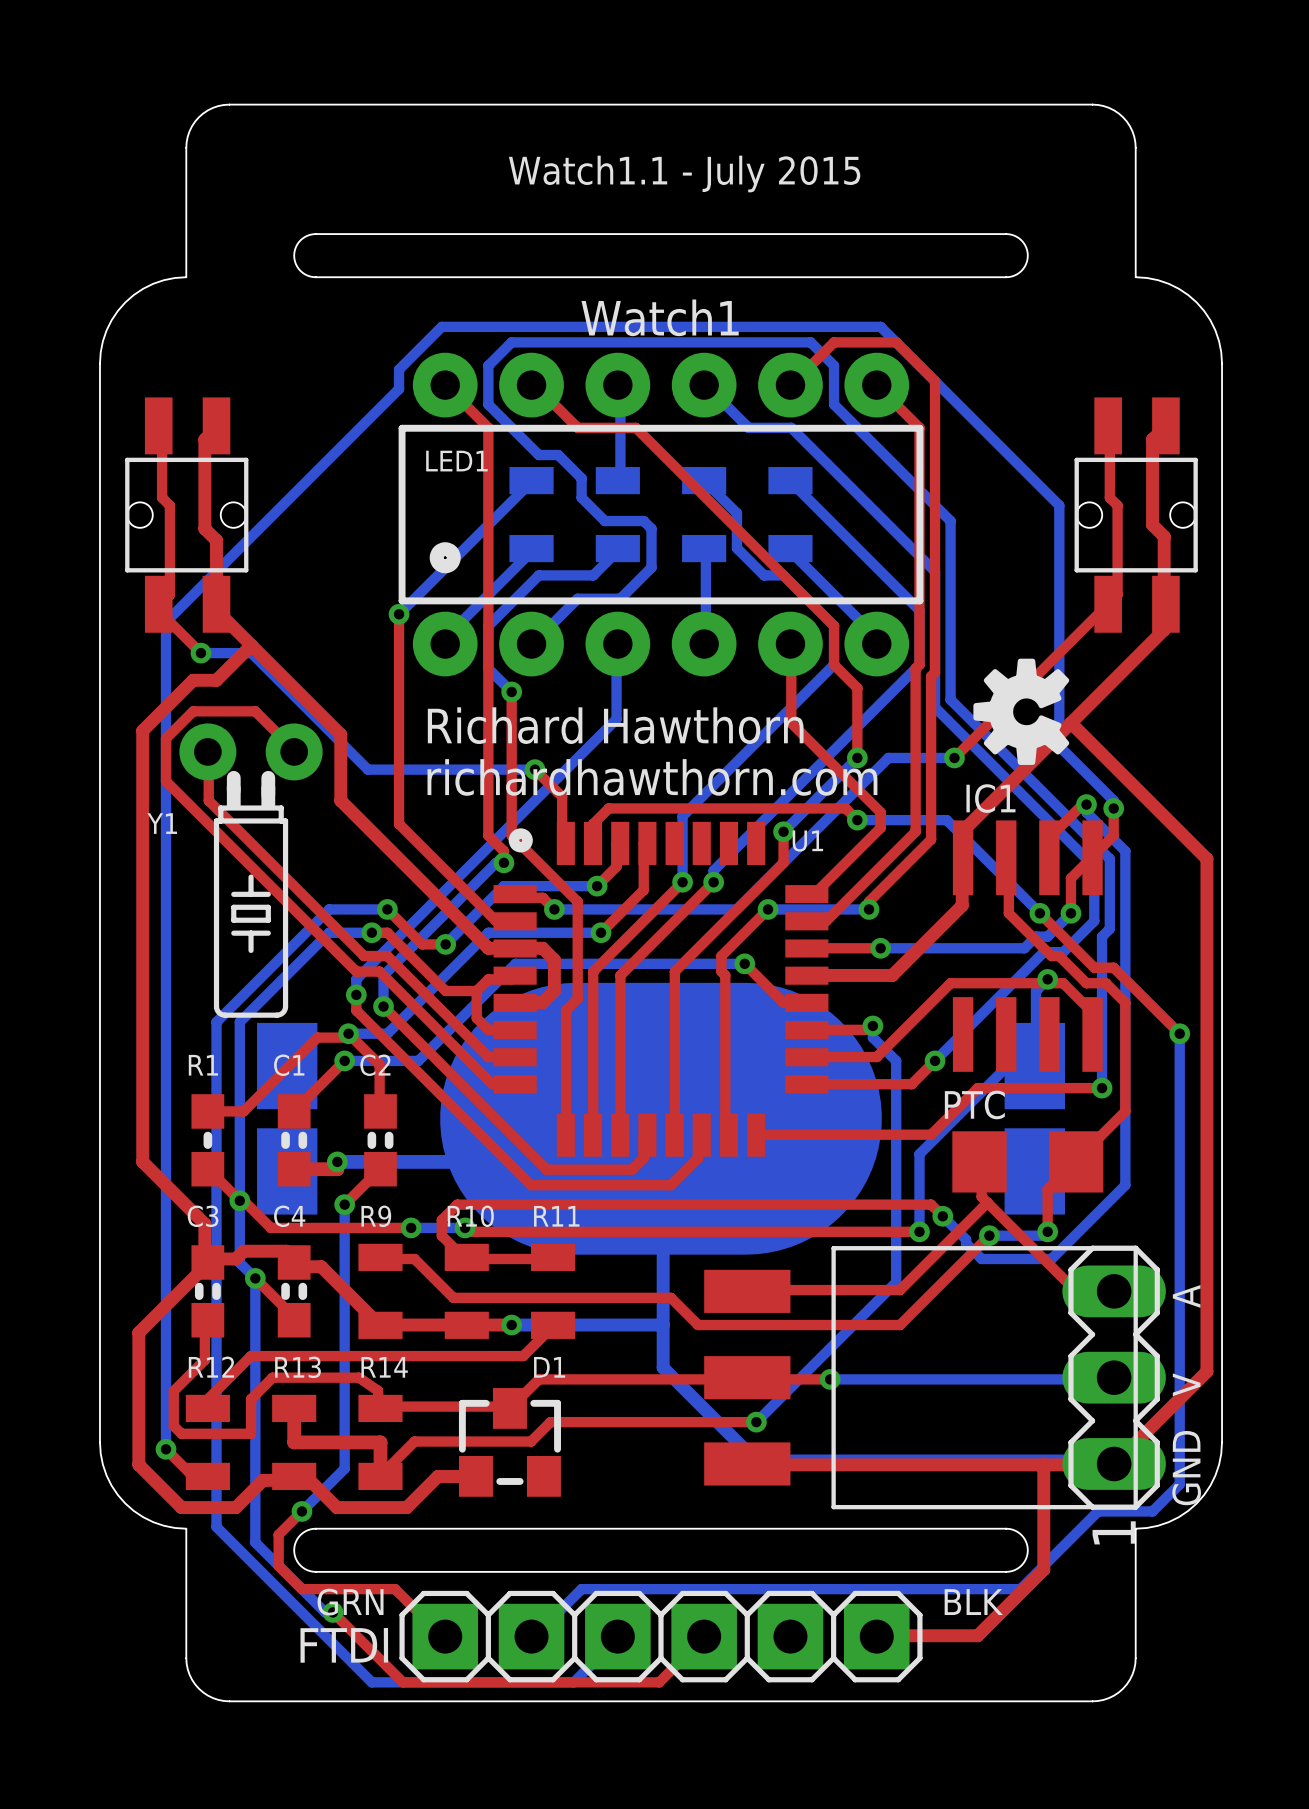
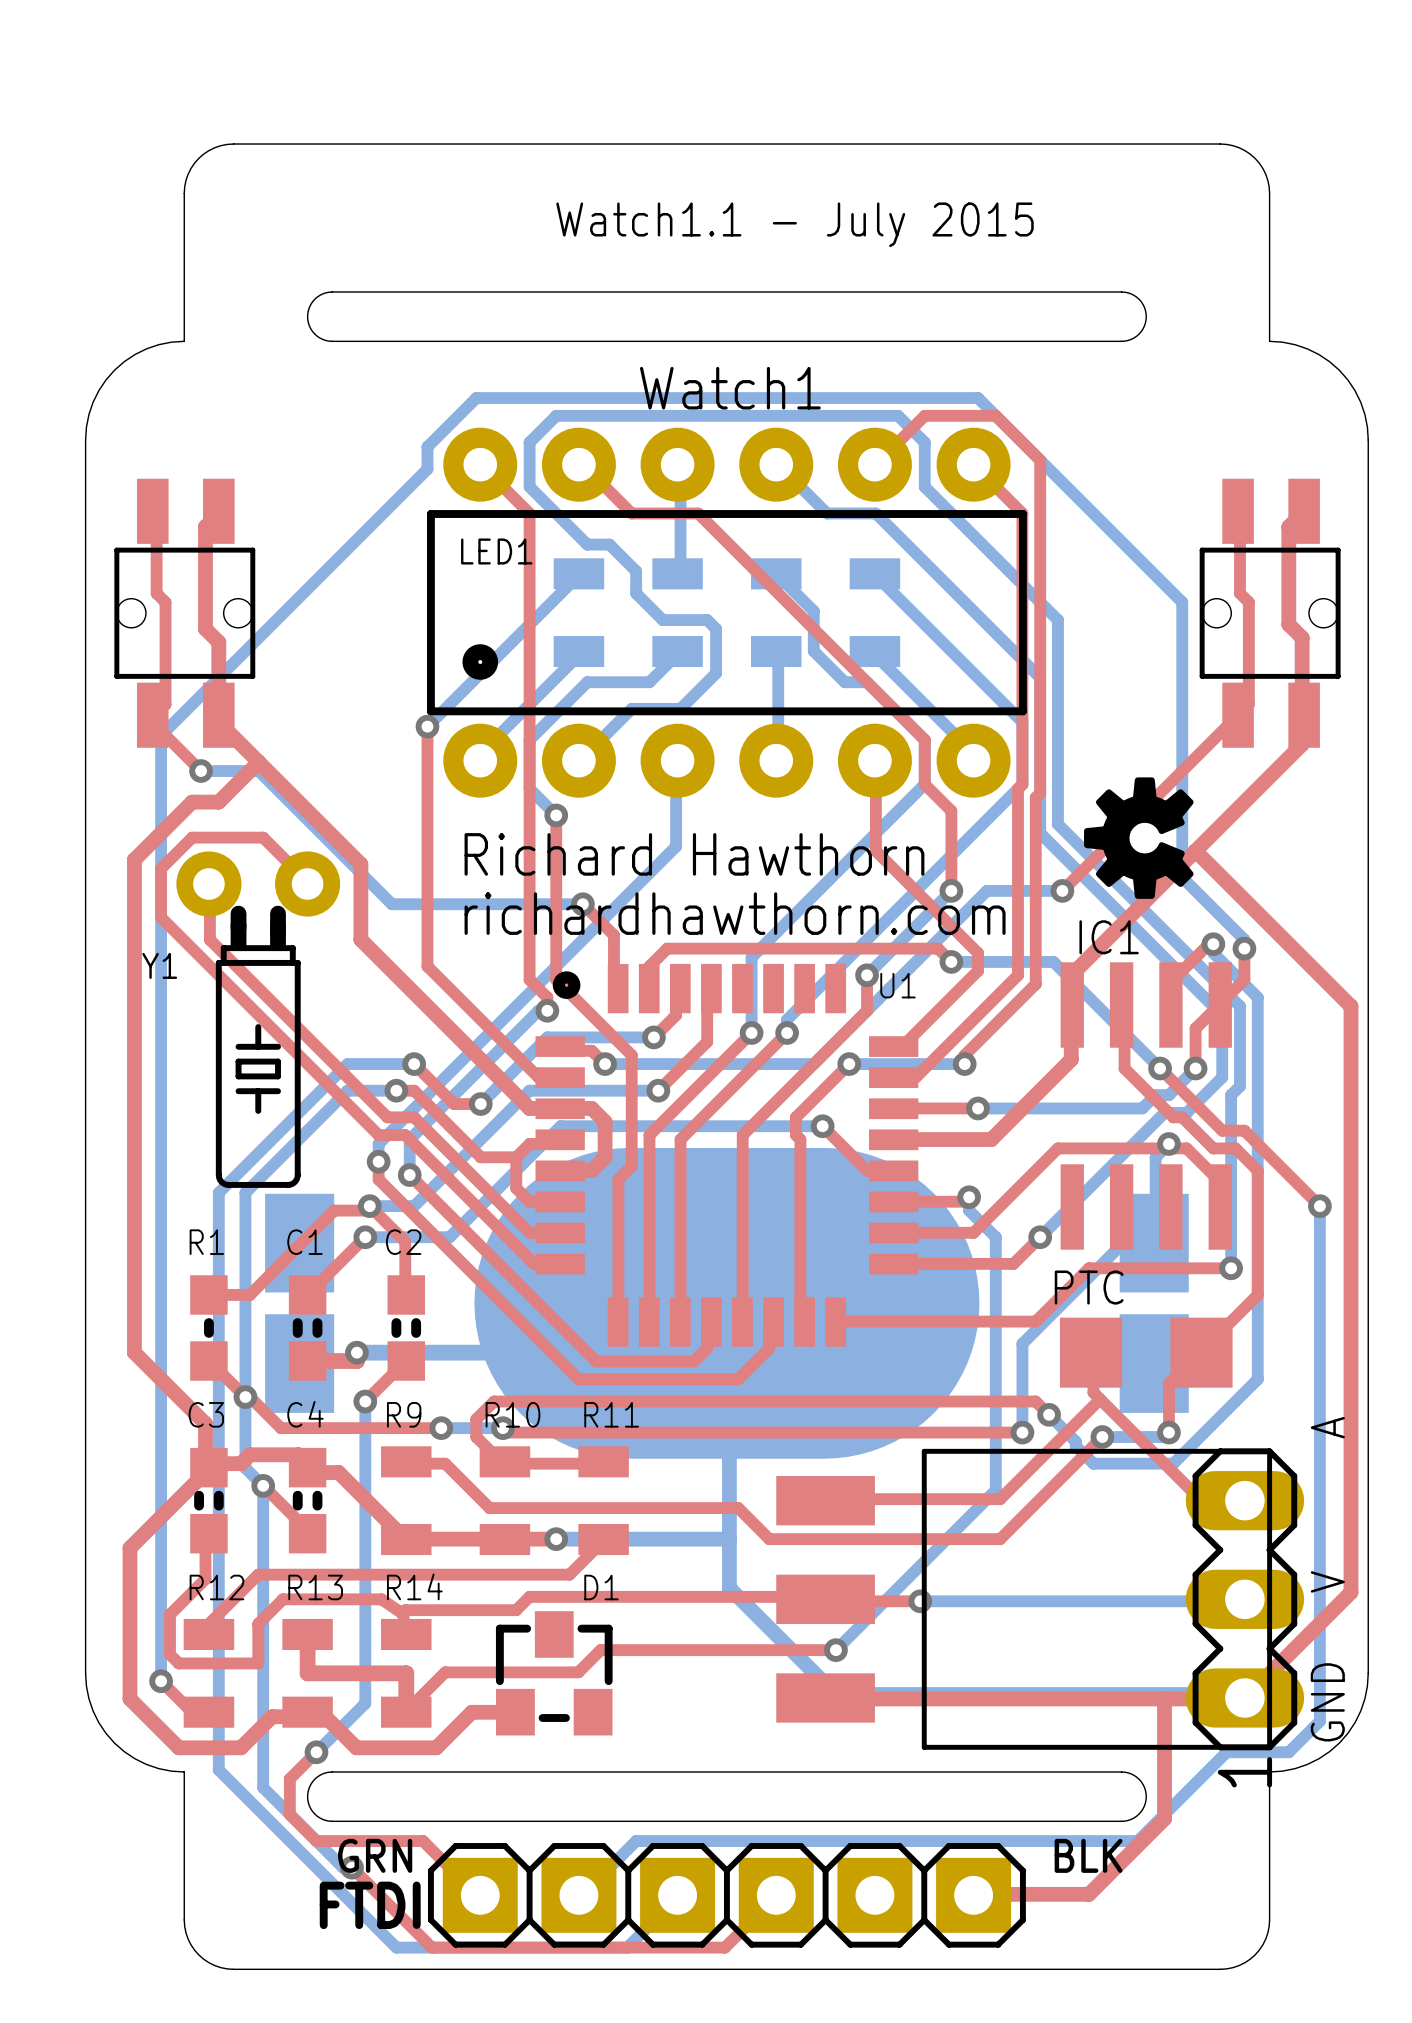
top track: none -> (825, 1599) (822, 1596) (529, 1596) (516, 1610) (405, 1610) (402, 1613)
top track: (744, 1379) (538, 1379) (509, 1408) (507, 1406) (383, 1406) -> none

